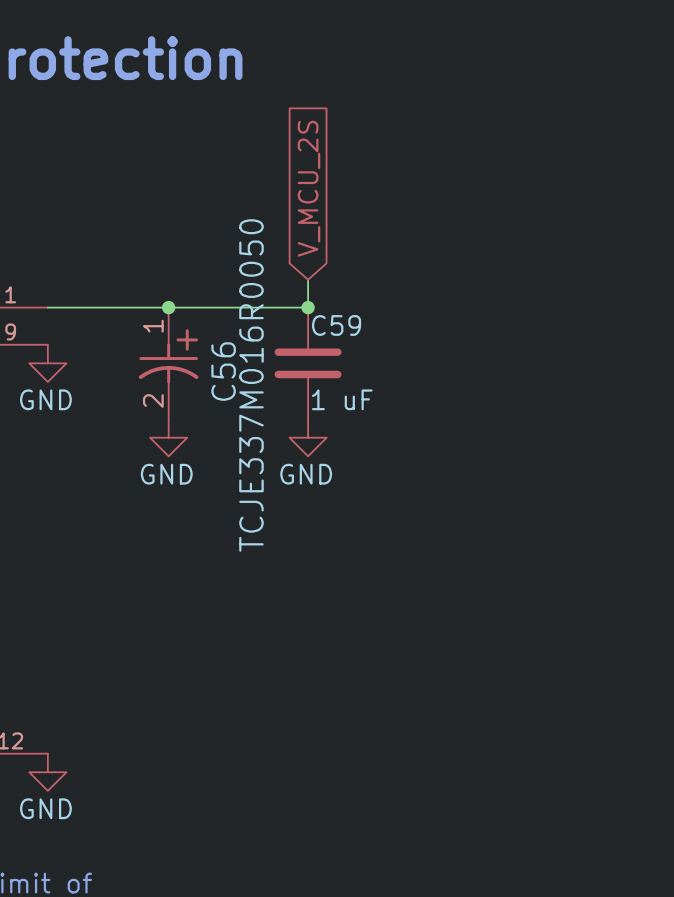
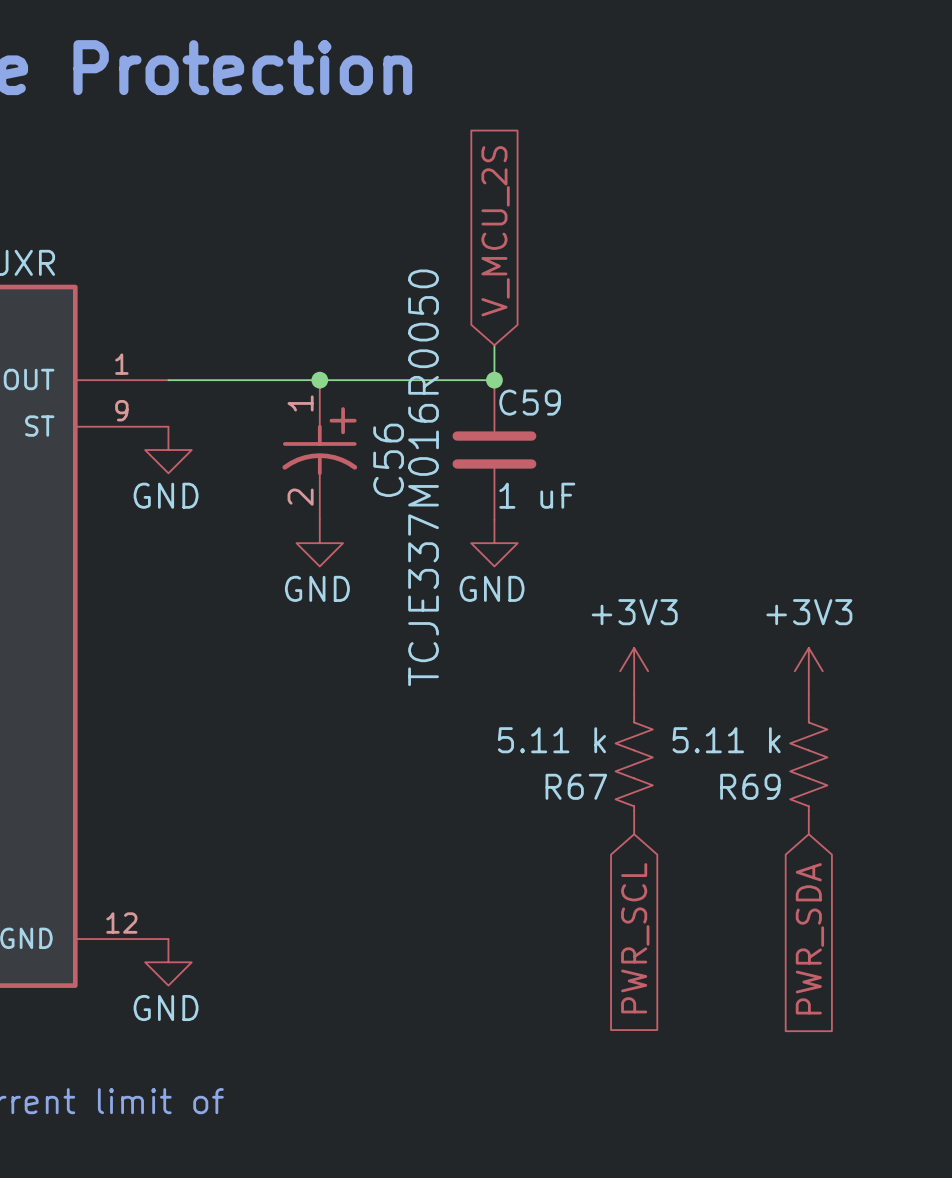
power symbol: none -> +3V3 (634, 671)
power symbol: none -> +3V3 (808, 671)
R67: none -> 5.11 k (634, 764)
R69: none -> 5.11 k (808, 764)
global label: none -> PWR_SCL (635, 938)
global label: none -> PWR_SDA (809, 938)

